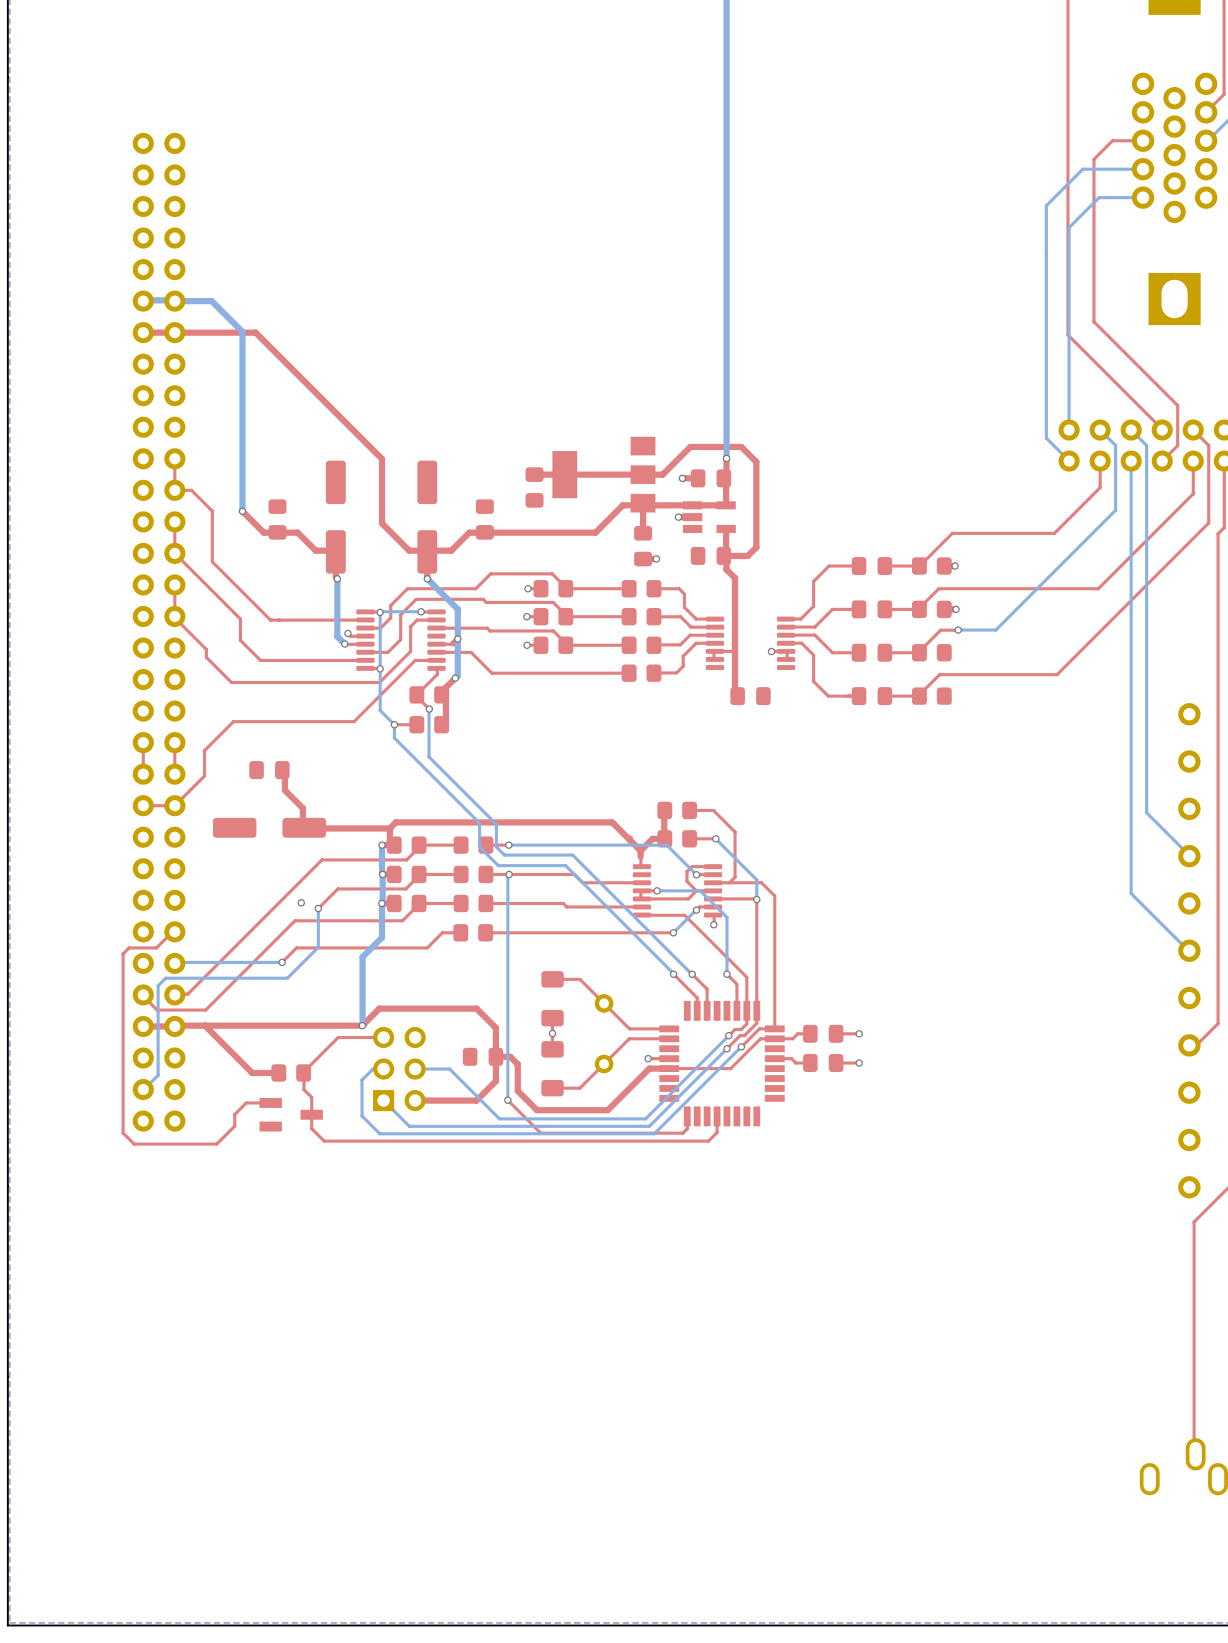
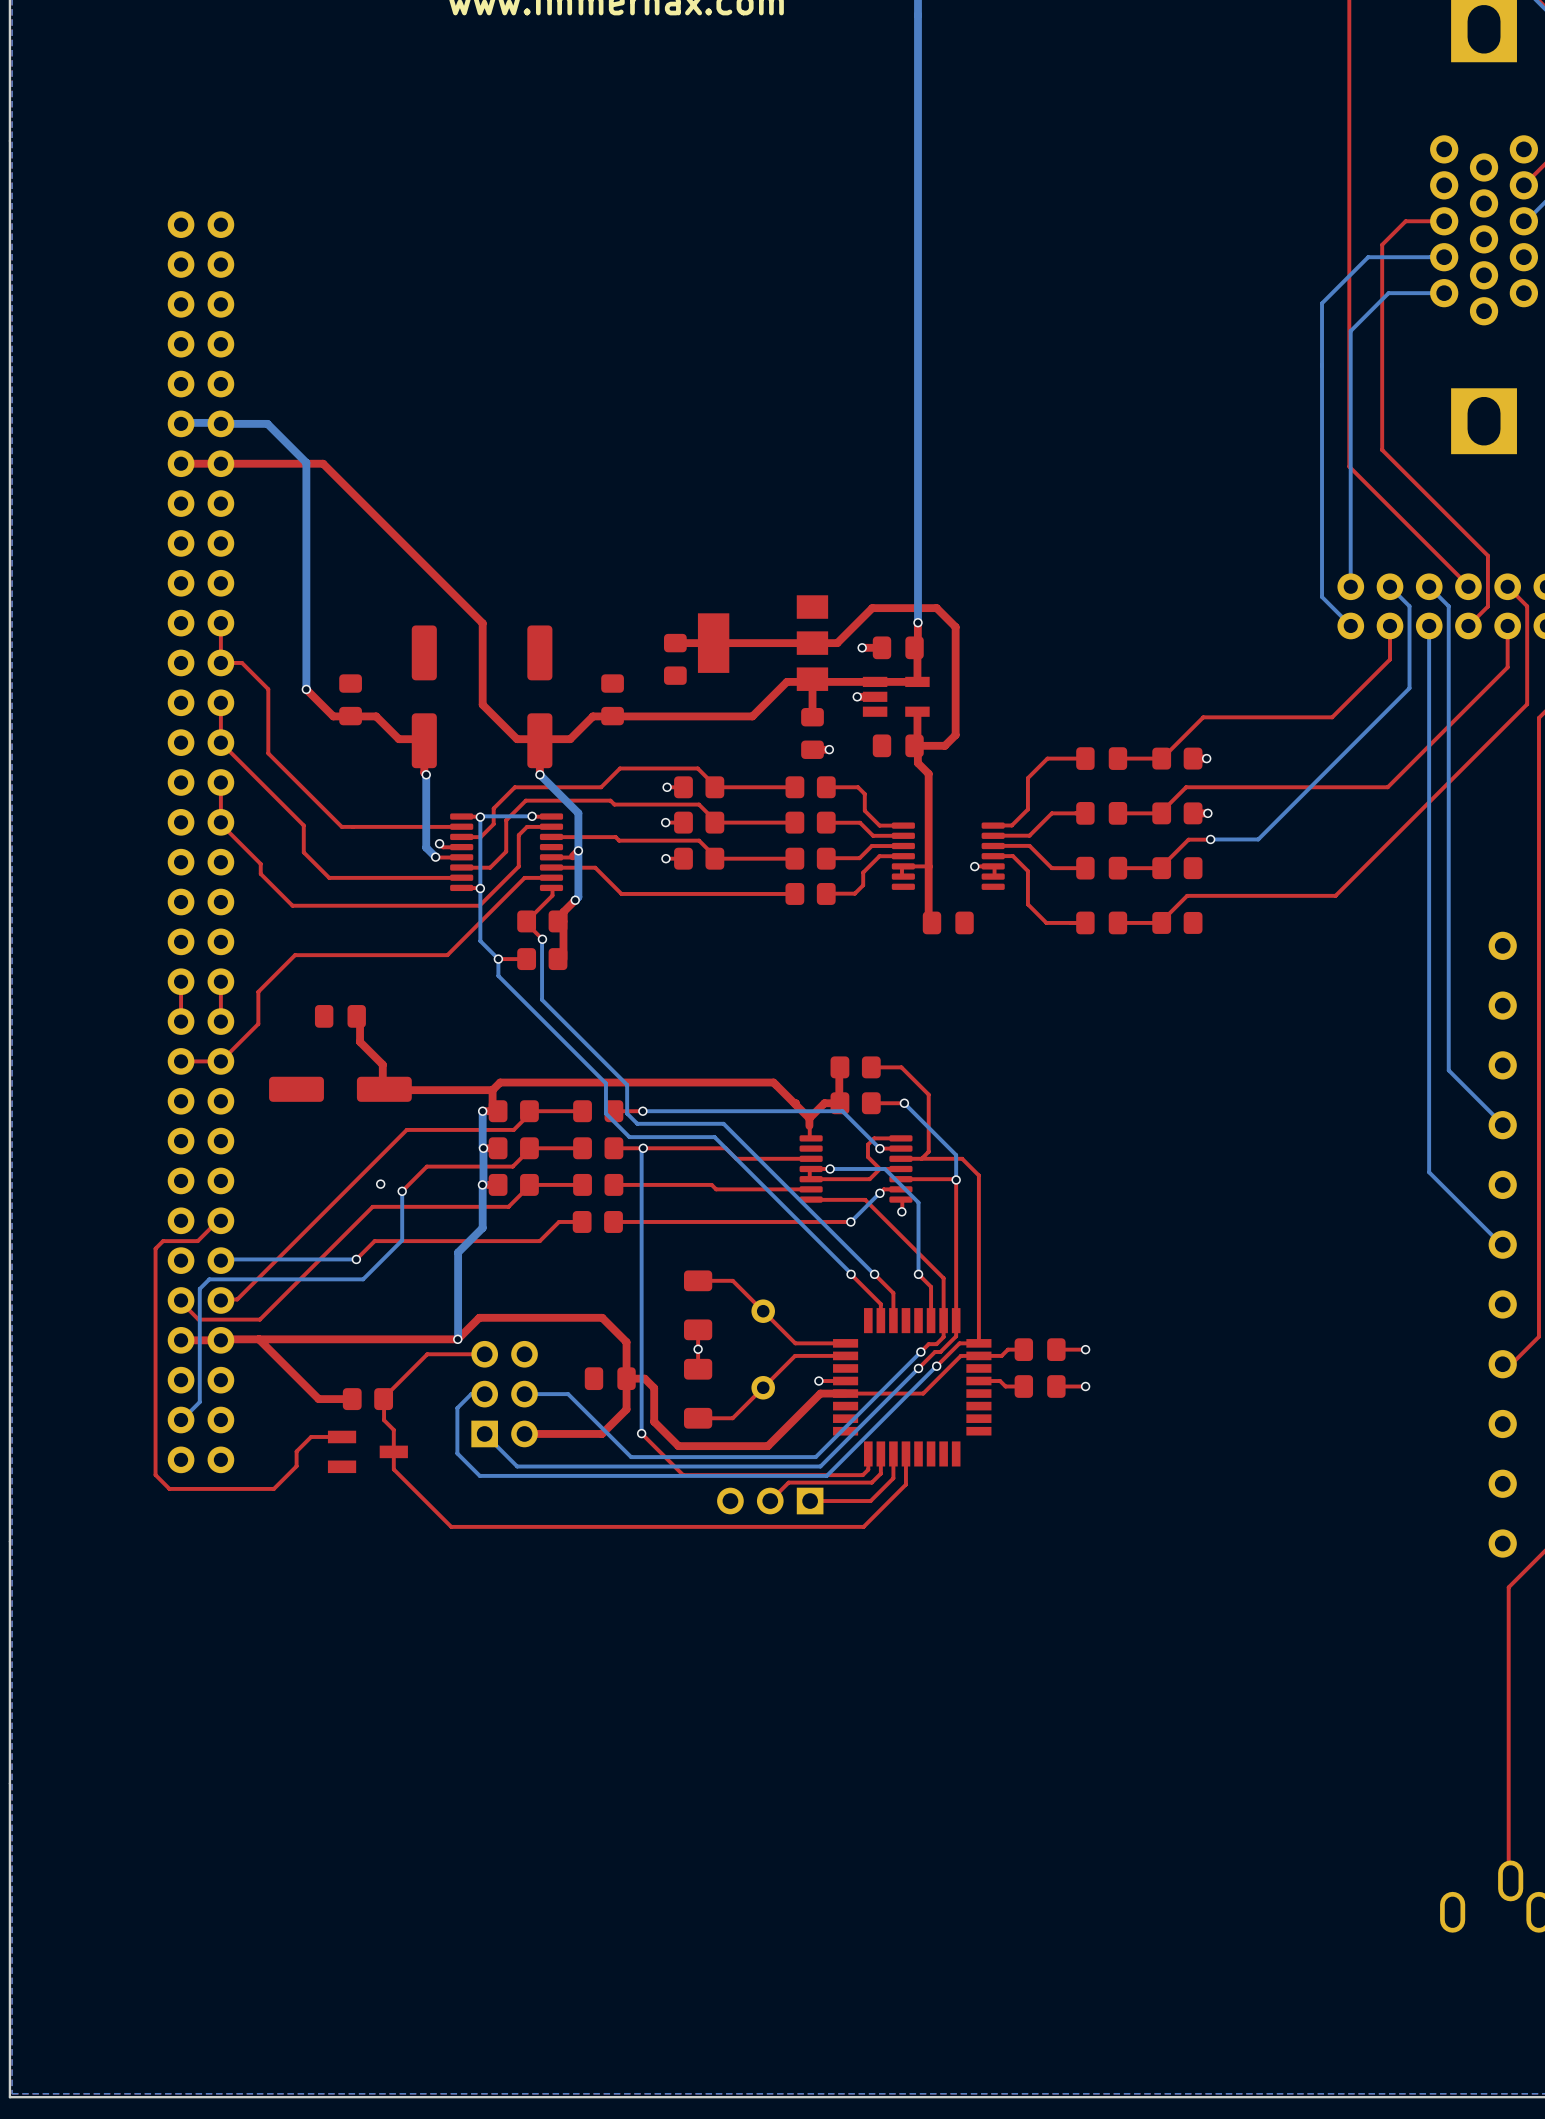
top track: none -> (880, 1453) (880, 1473) (871, 1482) (788, 1482) (770, 1501)
top track: none -> (893, 1453) (893, 1478) (870, 1501) (810, 1501)
top track: (717, 1132) (708, 1141) (324, 1141) -> (905, 1474) (905, 1484) (863, 1526) (451, 1526) (409, 1485)
part: none -> (770, 1501)

